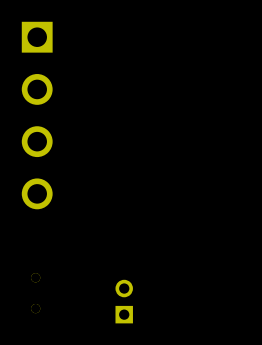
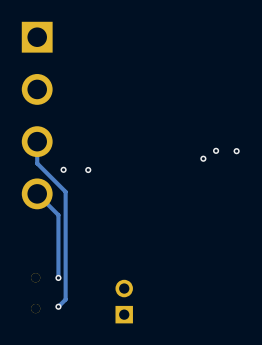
track: none -> (37, 141) (37, 163) (65, 191) (65, 299) (58, 306)
via: none -> (216, 150)
via: none -> (236, 151)
via: none -> (203, 158)
via: none -> (63, 169)
via: none -> (88, 170)
track: none -> (37, 193) (58, 215) (58, 277)
via: none -> (58, 277)
via: none -> (58, 306)

